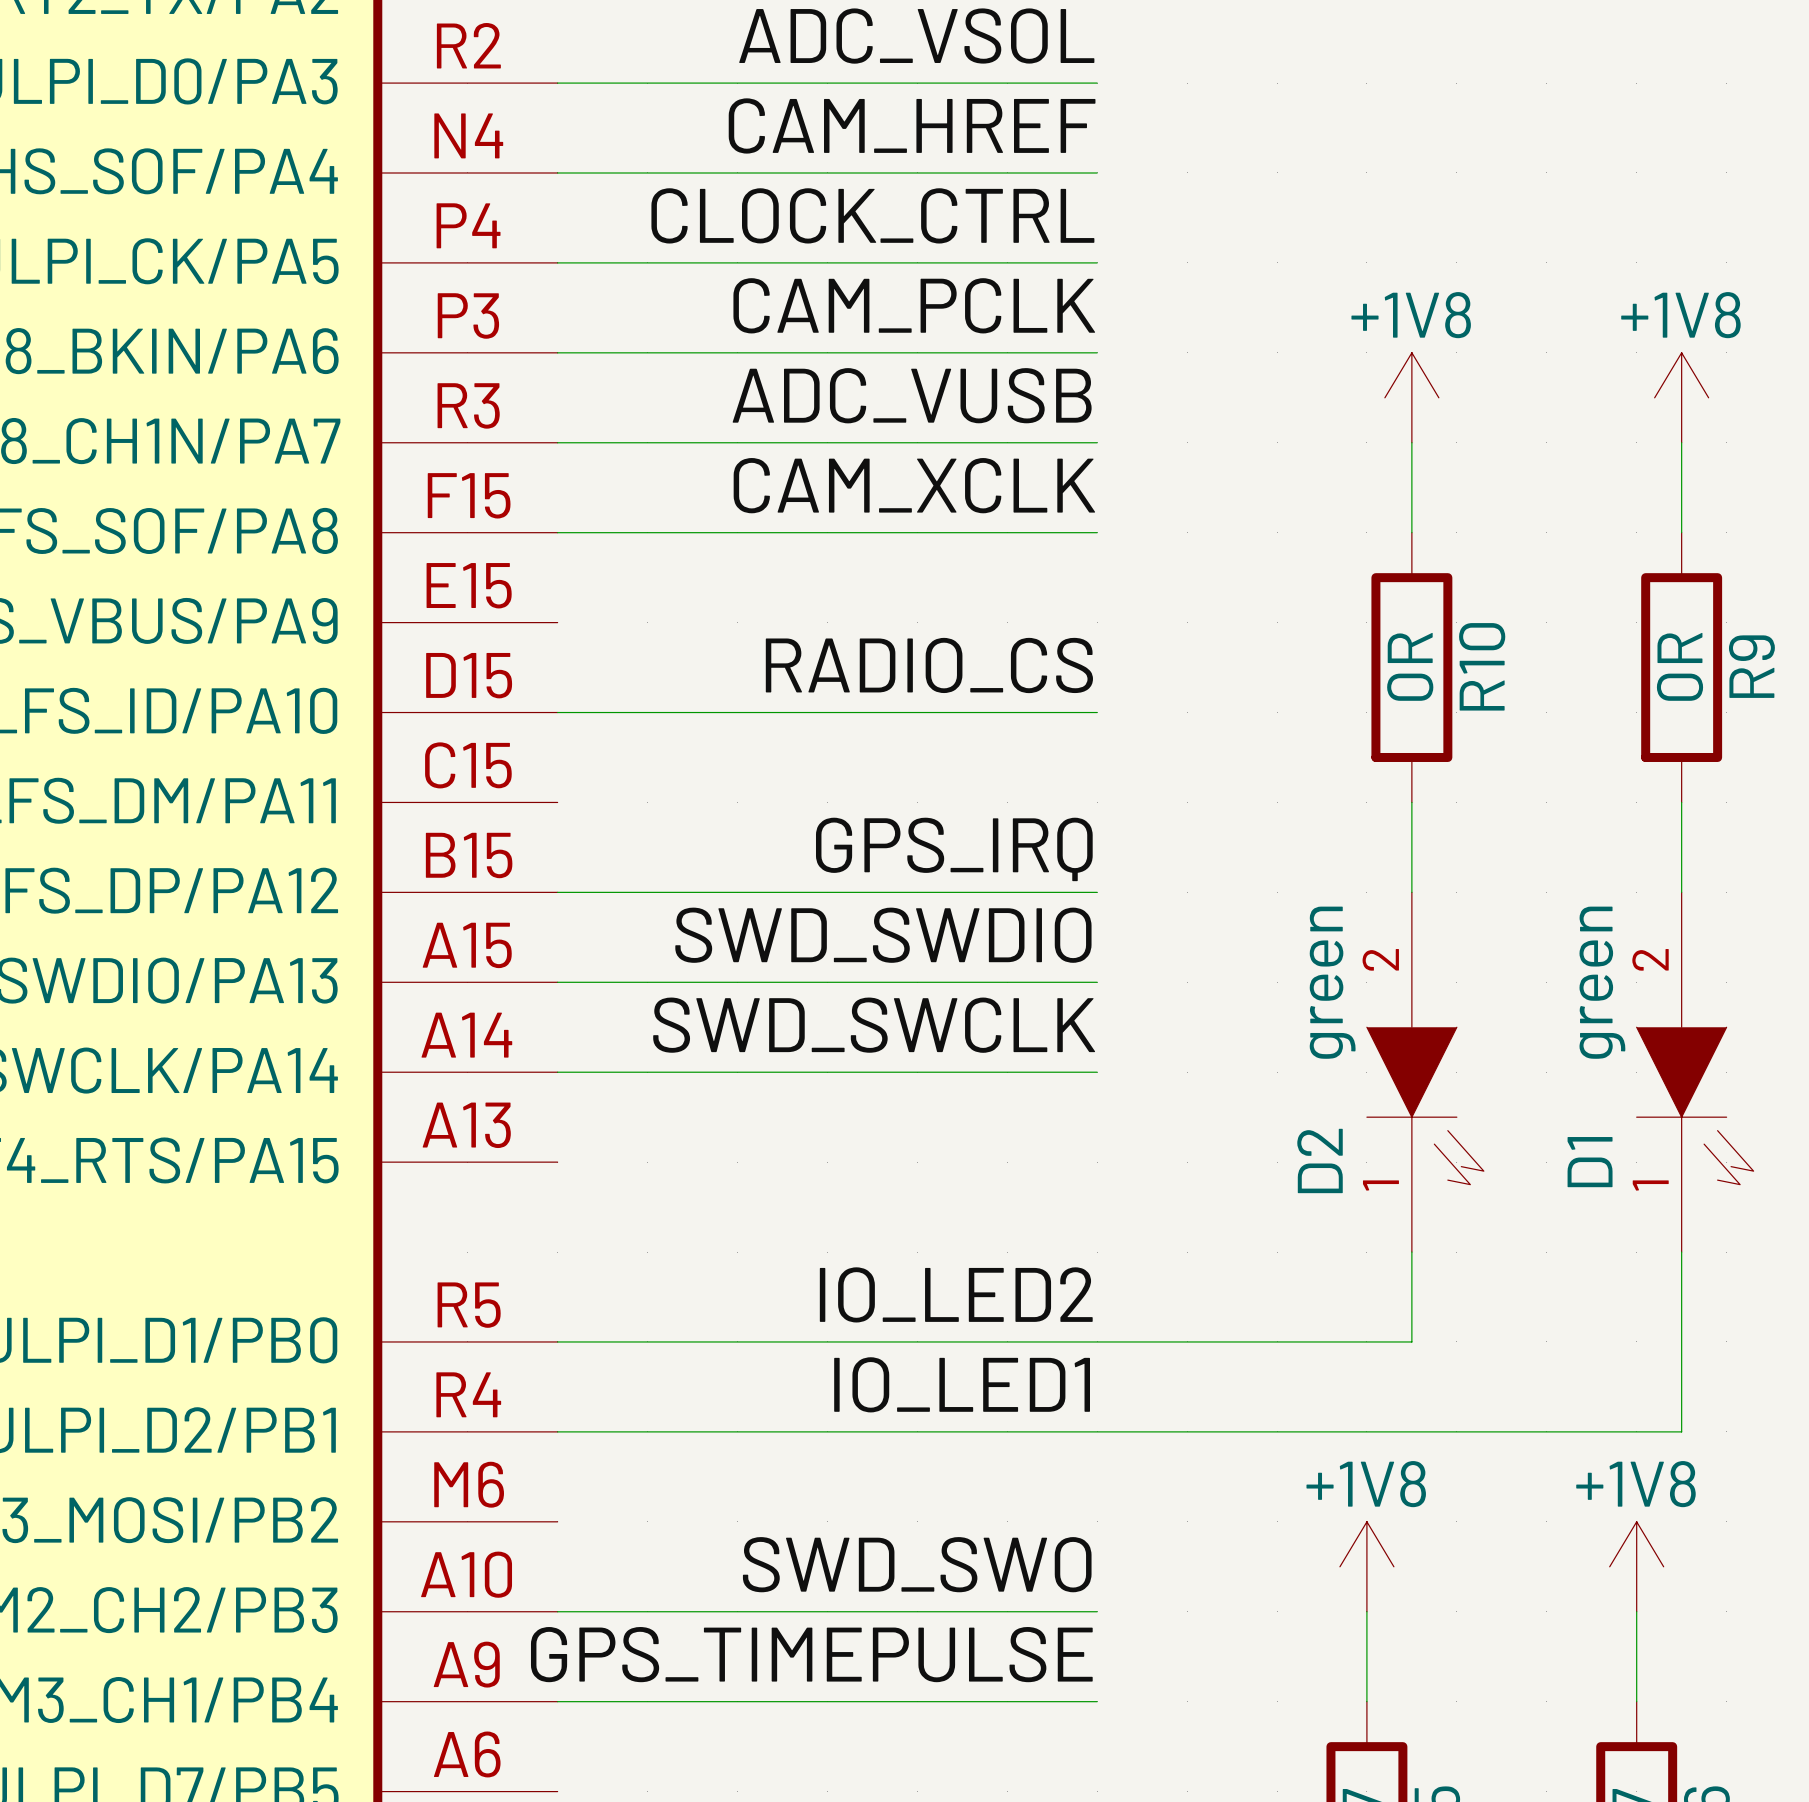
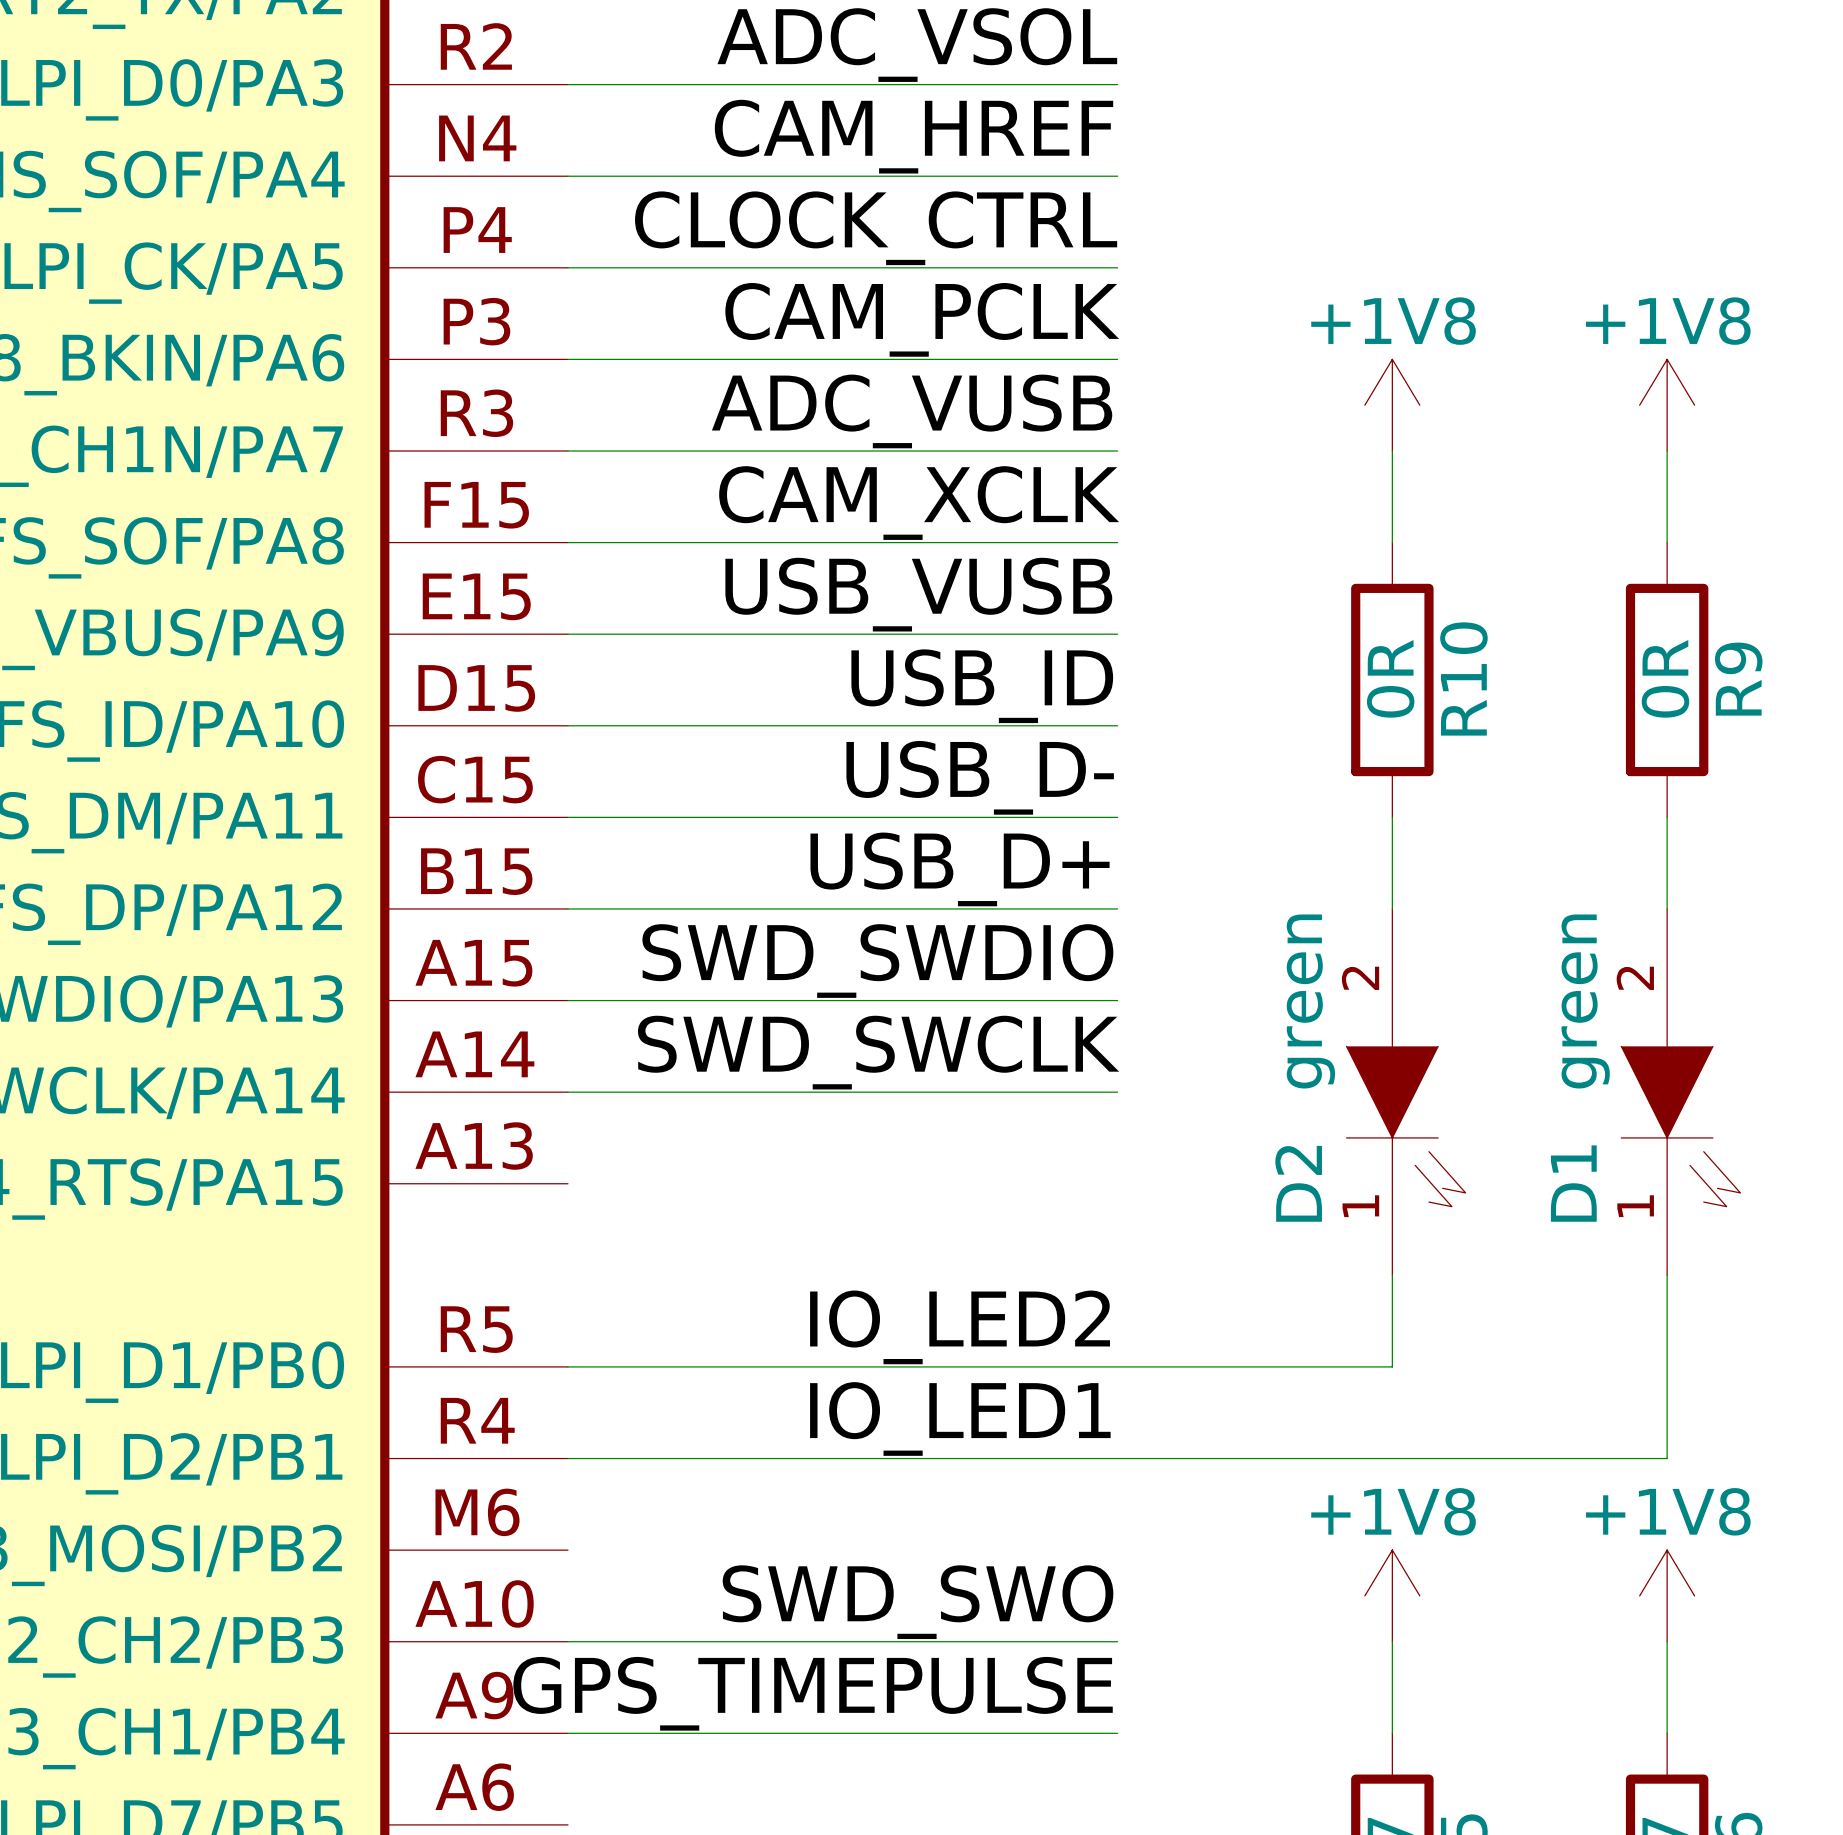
power symbol position: +1V8 (1411, 397) -> +1V8 (1392, 405)
power symbol position: +1V8 (1681, 397) -> +1V8 (1667, 405)
wire: (1411, 442) (1411, 532) -> (1392, 451) (1392, 542)
wire: (1681, 442) (1681, 532) -> (1667, 451) (1667, 542)
label: none -> USB_VUSB (918, 594)
wire: none -> (568, 634) (1117, 634)
label: RADIO_CS (929, 665) -> USB_ID (982, 686)
R10 position: (1411, 667) -> (1392, 679)
R9 position: (1681, 667) -> (1667, 679)
label: none -> USB_D- (980, 777)
wire: none -> (568, 817) (1117, 817)
wire: (1411, 802) (1411, 892) -> (1392, 817) (1392, 908)
wire: (1681, 802) (1681, 892) -> (1667, 817) (1667, 908)
label: GPS_IRQ (954, 849) -> USB_D+ (960, 869)
D2 position: (1425, 1072) -> (1406, 1092)
D1 position: (1695, 1072) -> (1680, 1092)
wire: (1411, 1252) (1411, 1341) (1366, 1341) -> (1392, 1275) (1392, 1366)
wire: (1681, 1252) (1681, 1431) (1636, 1431) -> (1667, 1275) (1667, 1458)

